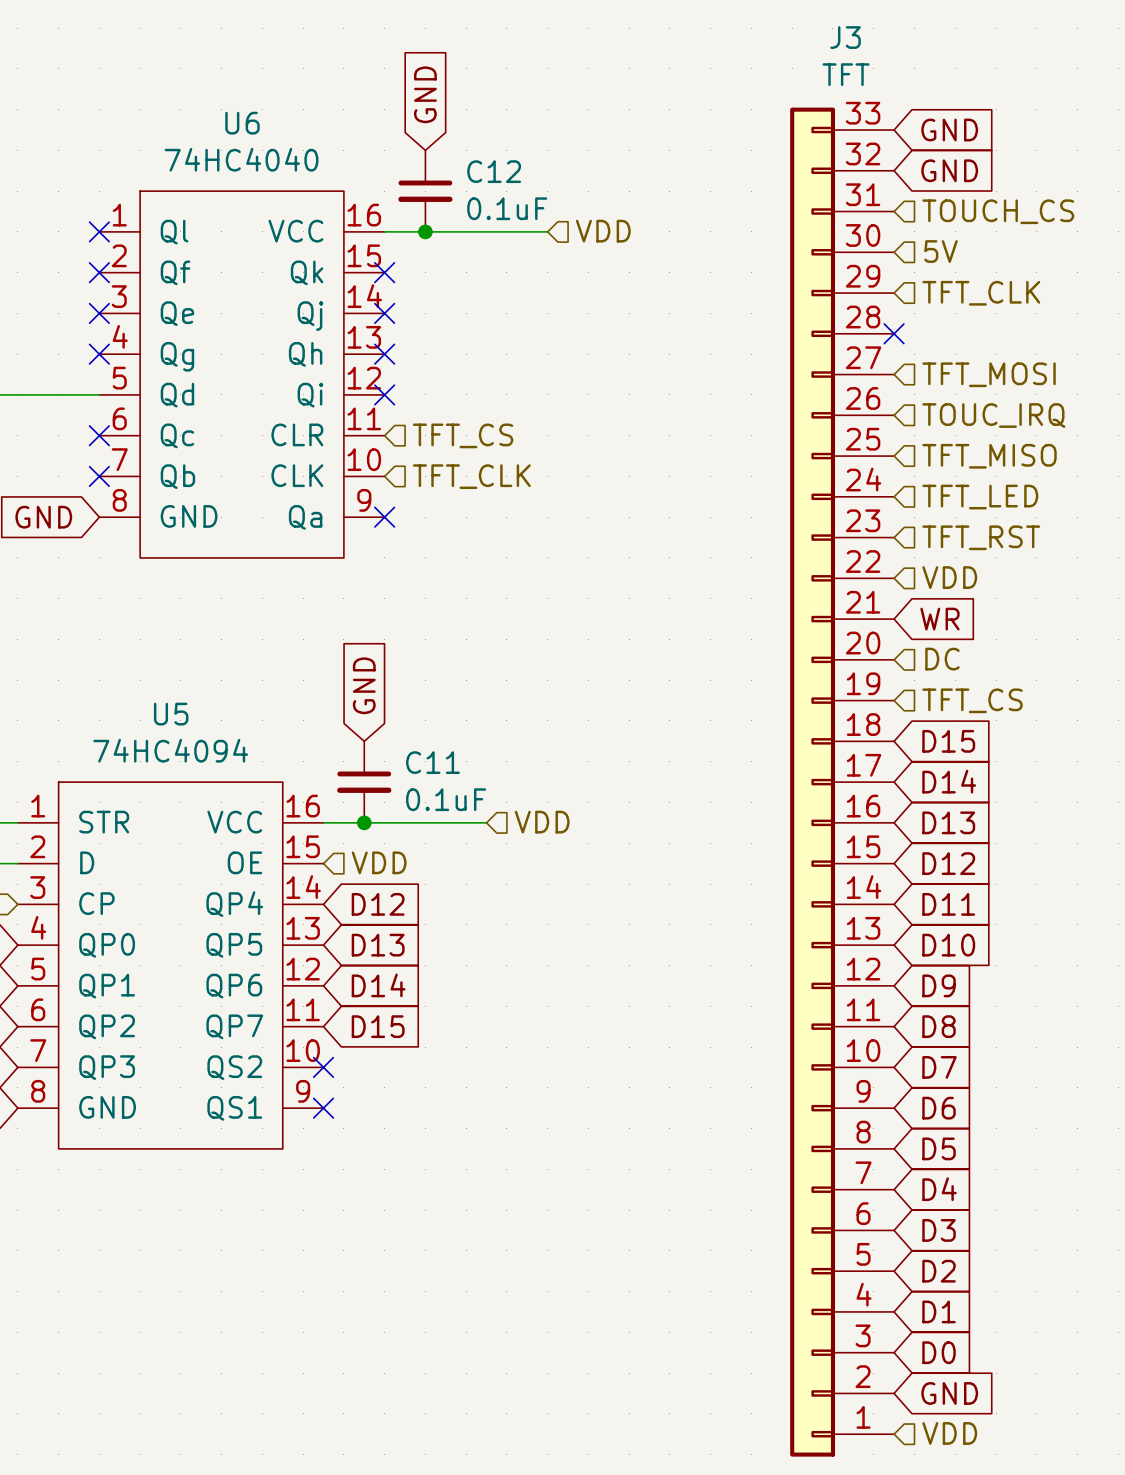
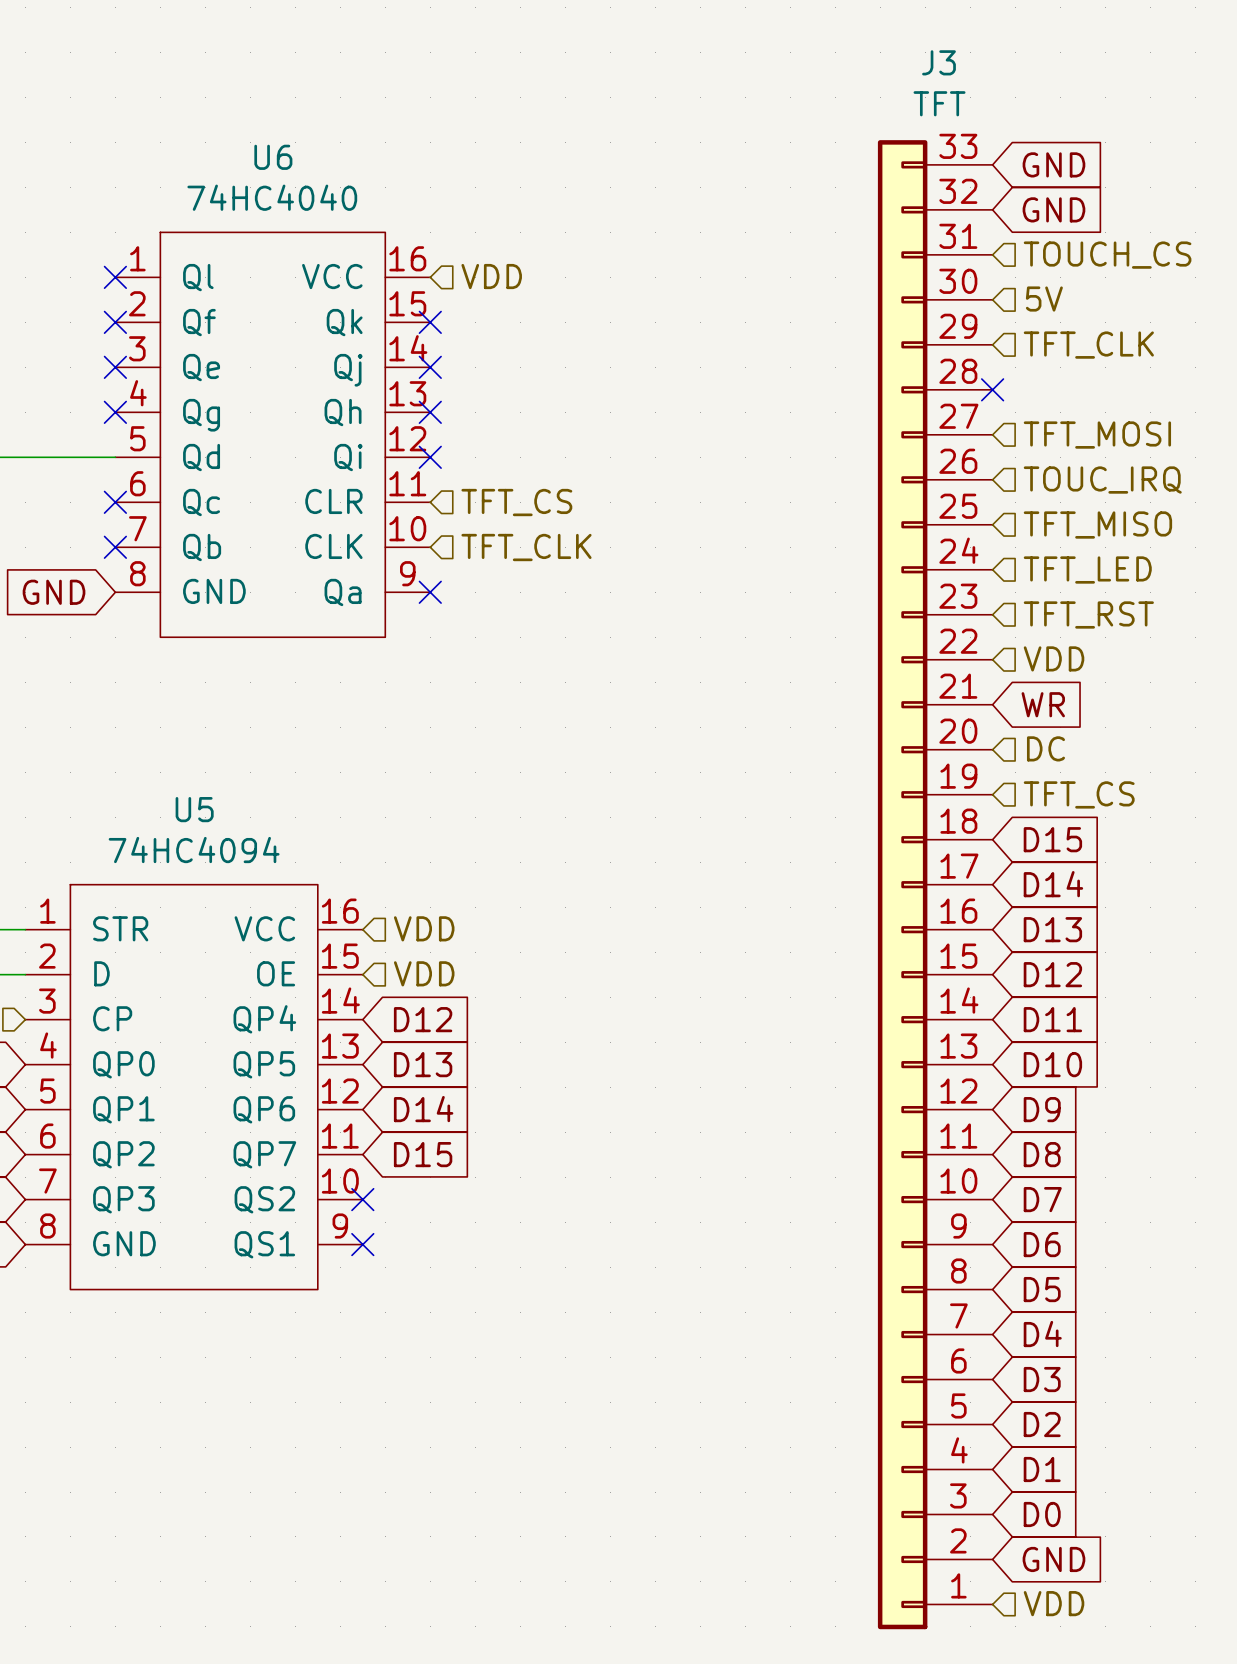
global label: GND (425, 94) -> none
C12: 0.1uF (425, 191) -> none
wire: (384, 231) (547, 231) -> none
junction: (425, 231) -> none
hierarchical label position: VDD (603, 231) -> VDD (491, 276)
global label: GND (364, 685) -> none
C11: 0.1uF (364, 782) -> none
wire: (323, 822) (486, 822) -> none
junction: (364, 822) -> none
hierarchical label position: VDD (542, 822) -> VDD (424, 928)

